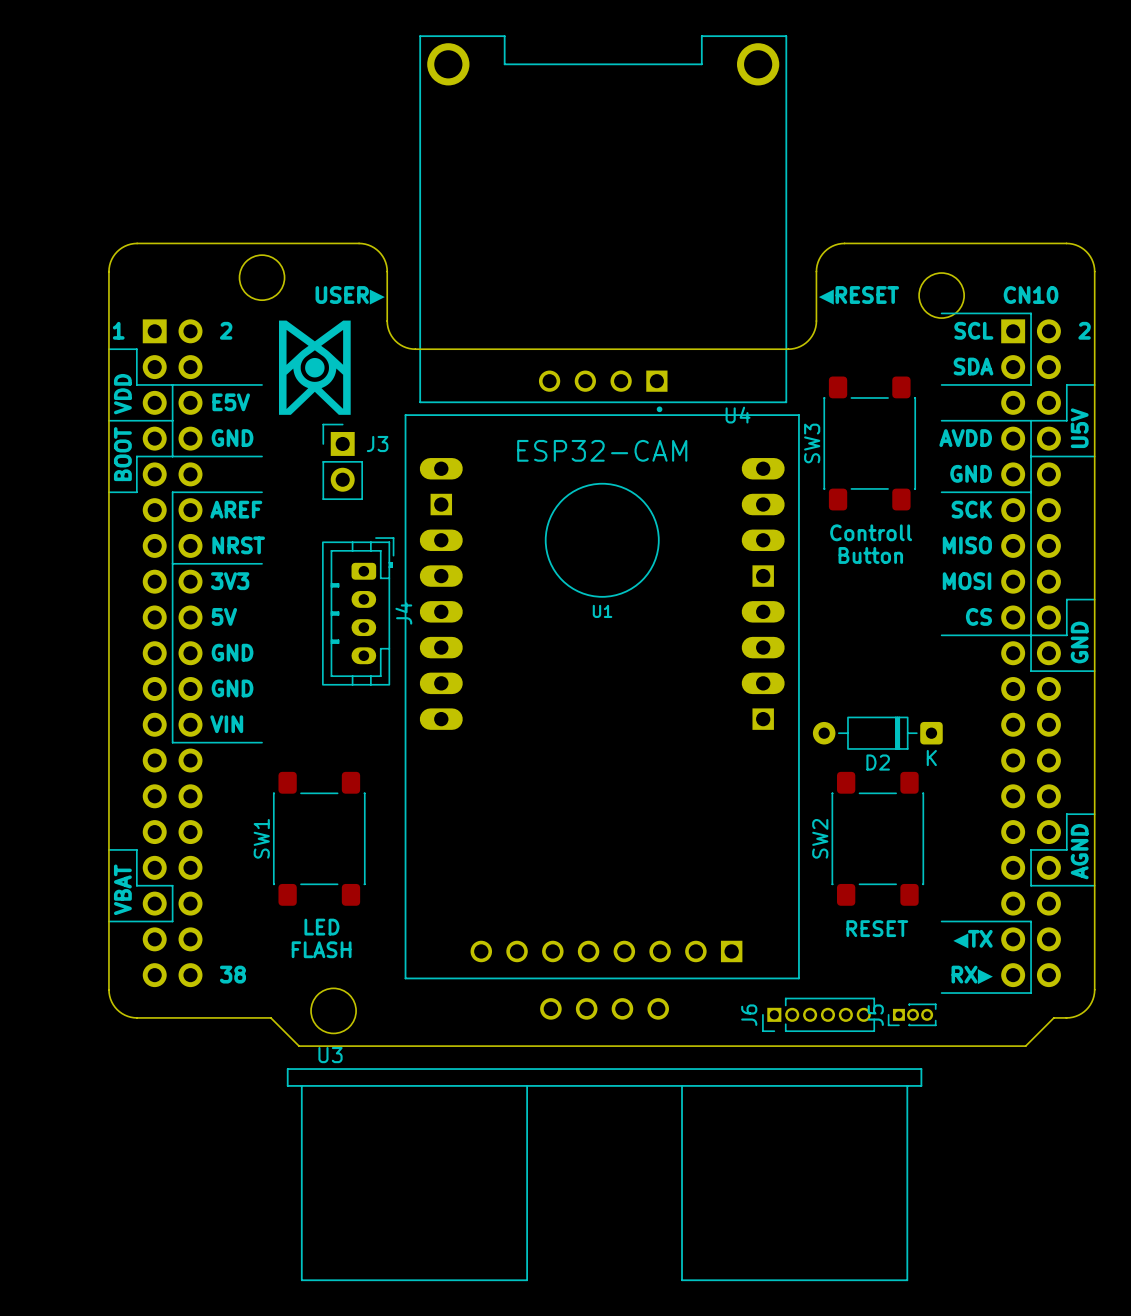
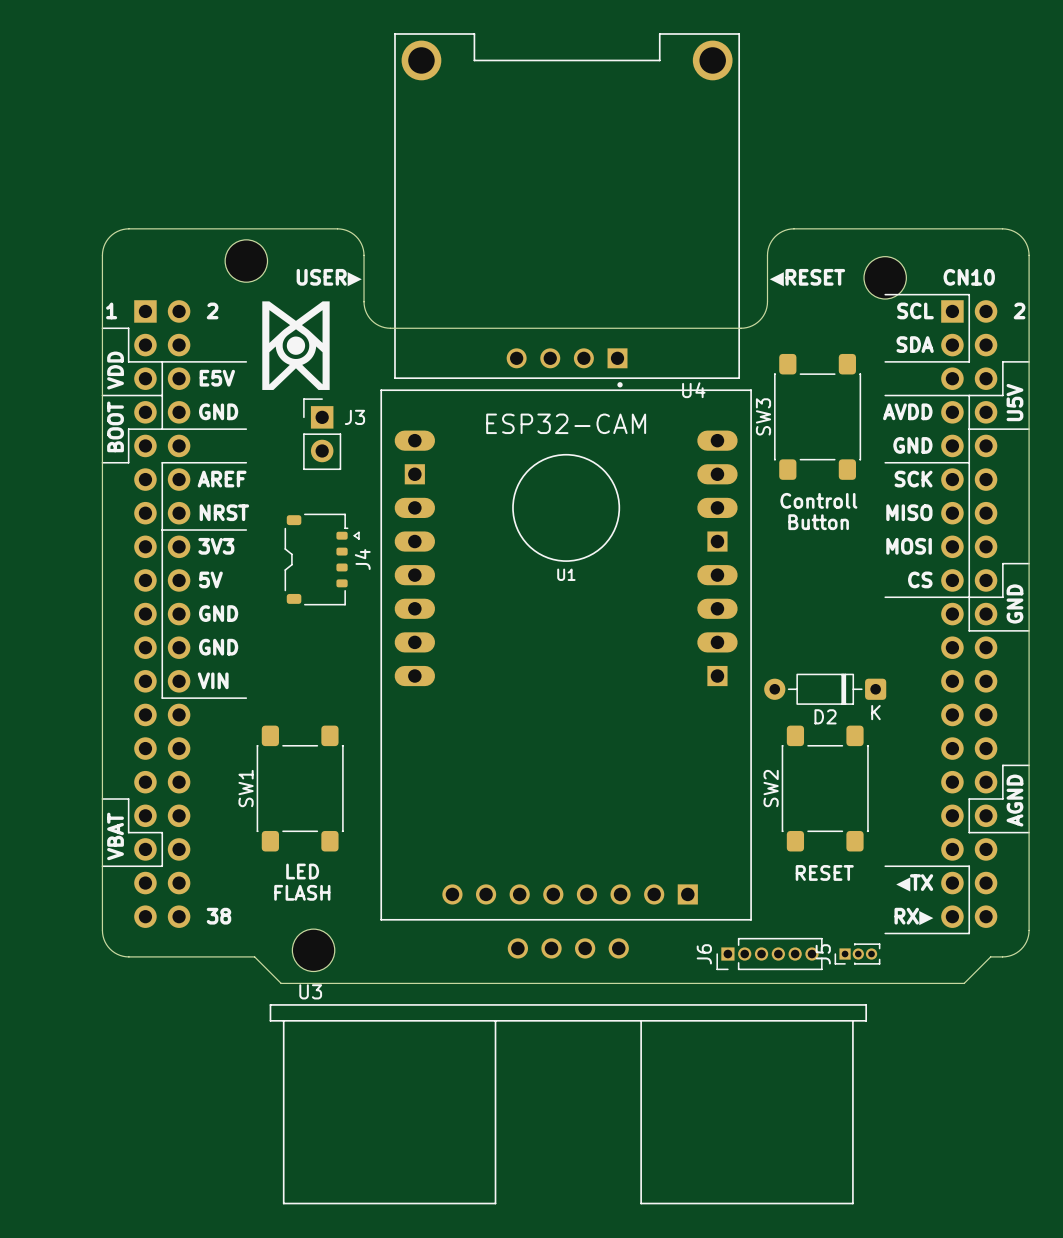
J4 footprint: [322, 537, 395, 686] -> [284, 513, 360, 606]

